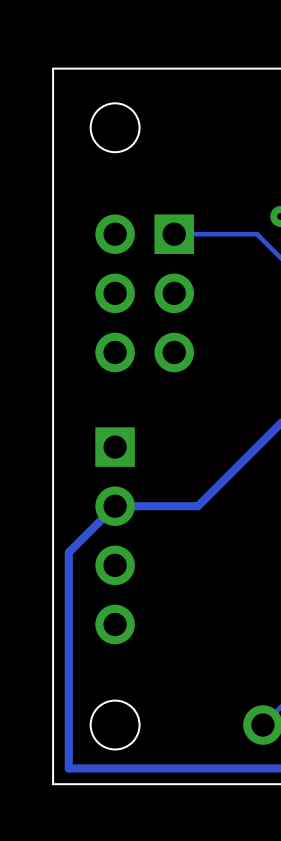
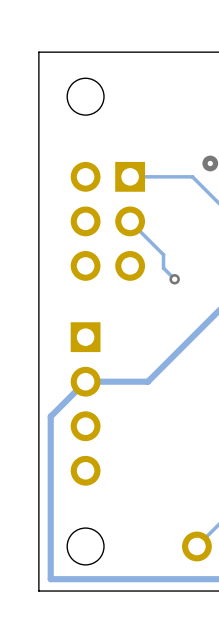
track: none -> (130, 221) (163, 254) (163, 268) (174, 279)
via: none -> (174, 279)

